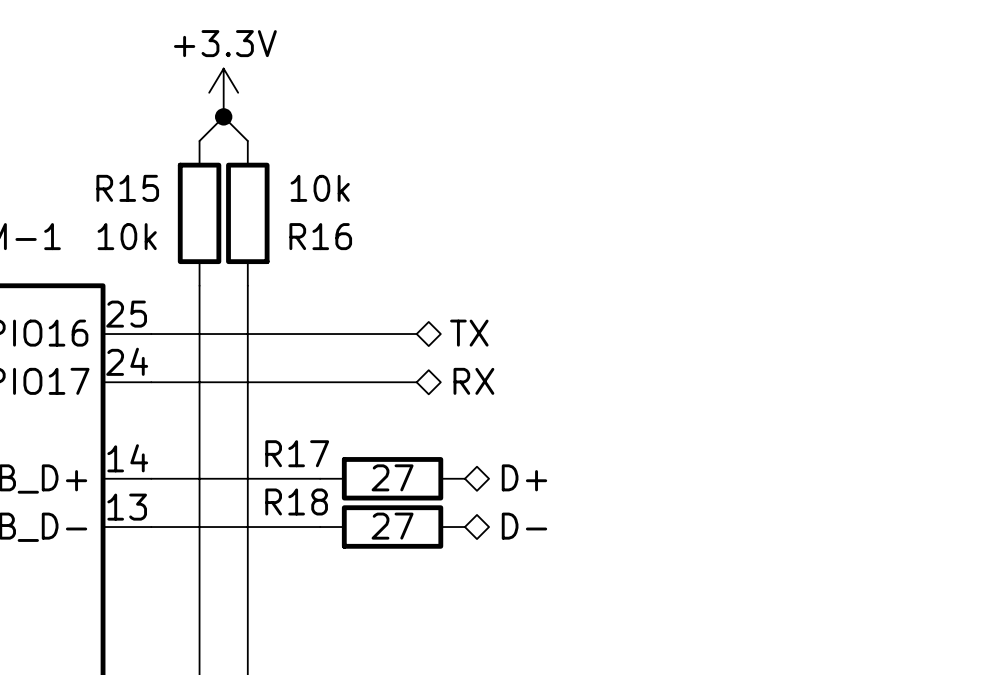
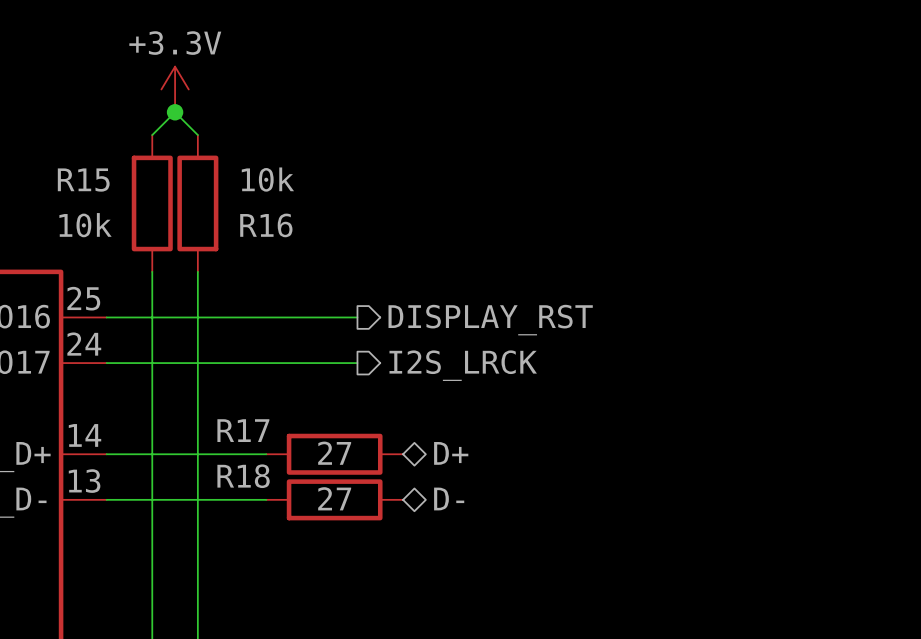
hierarchical label shape: bidirectional (469, 333) -> output (490, 320)
hierarchical label: TX (469, 333) -> DISPLAY_RST (490, 320)
hierarchical label shape: bidirectional (473, 381) -> output (463, 365)
hierarchical label: RX (473, 381) -> I2S_LRCK (463, 365)

